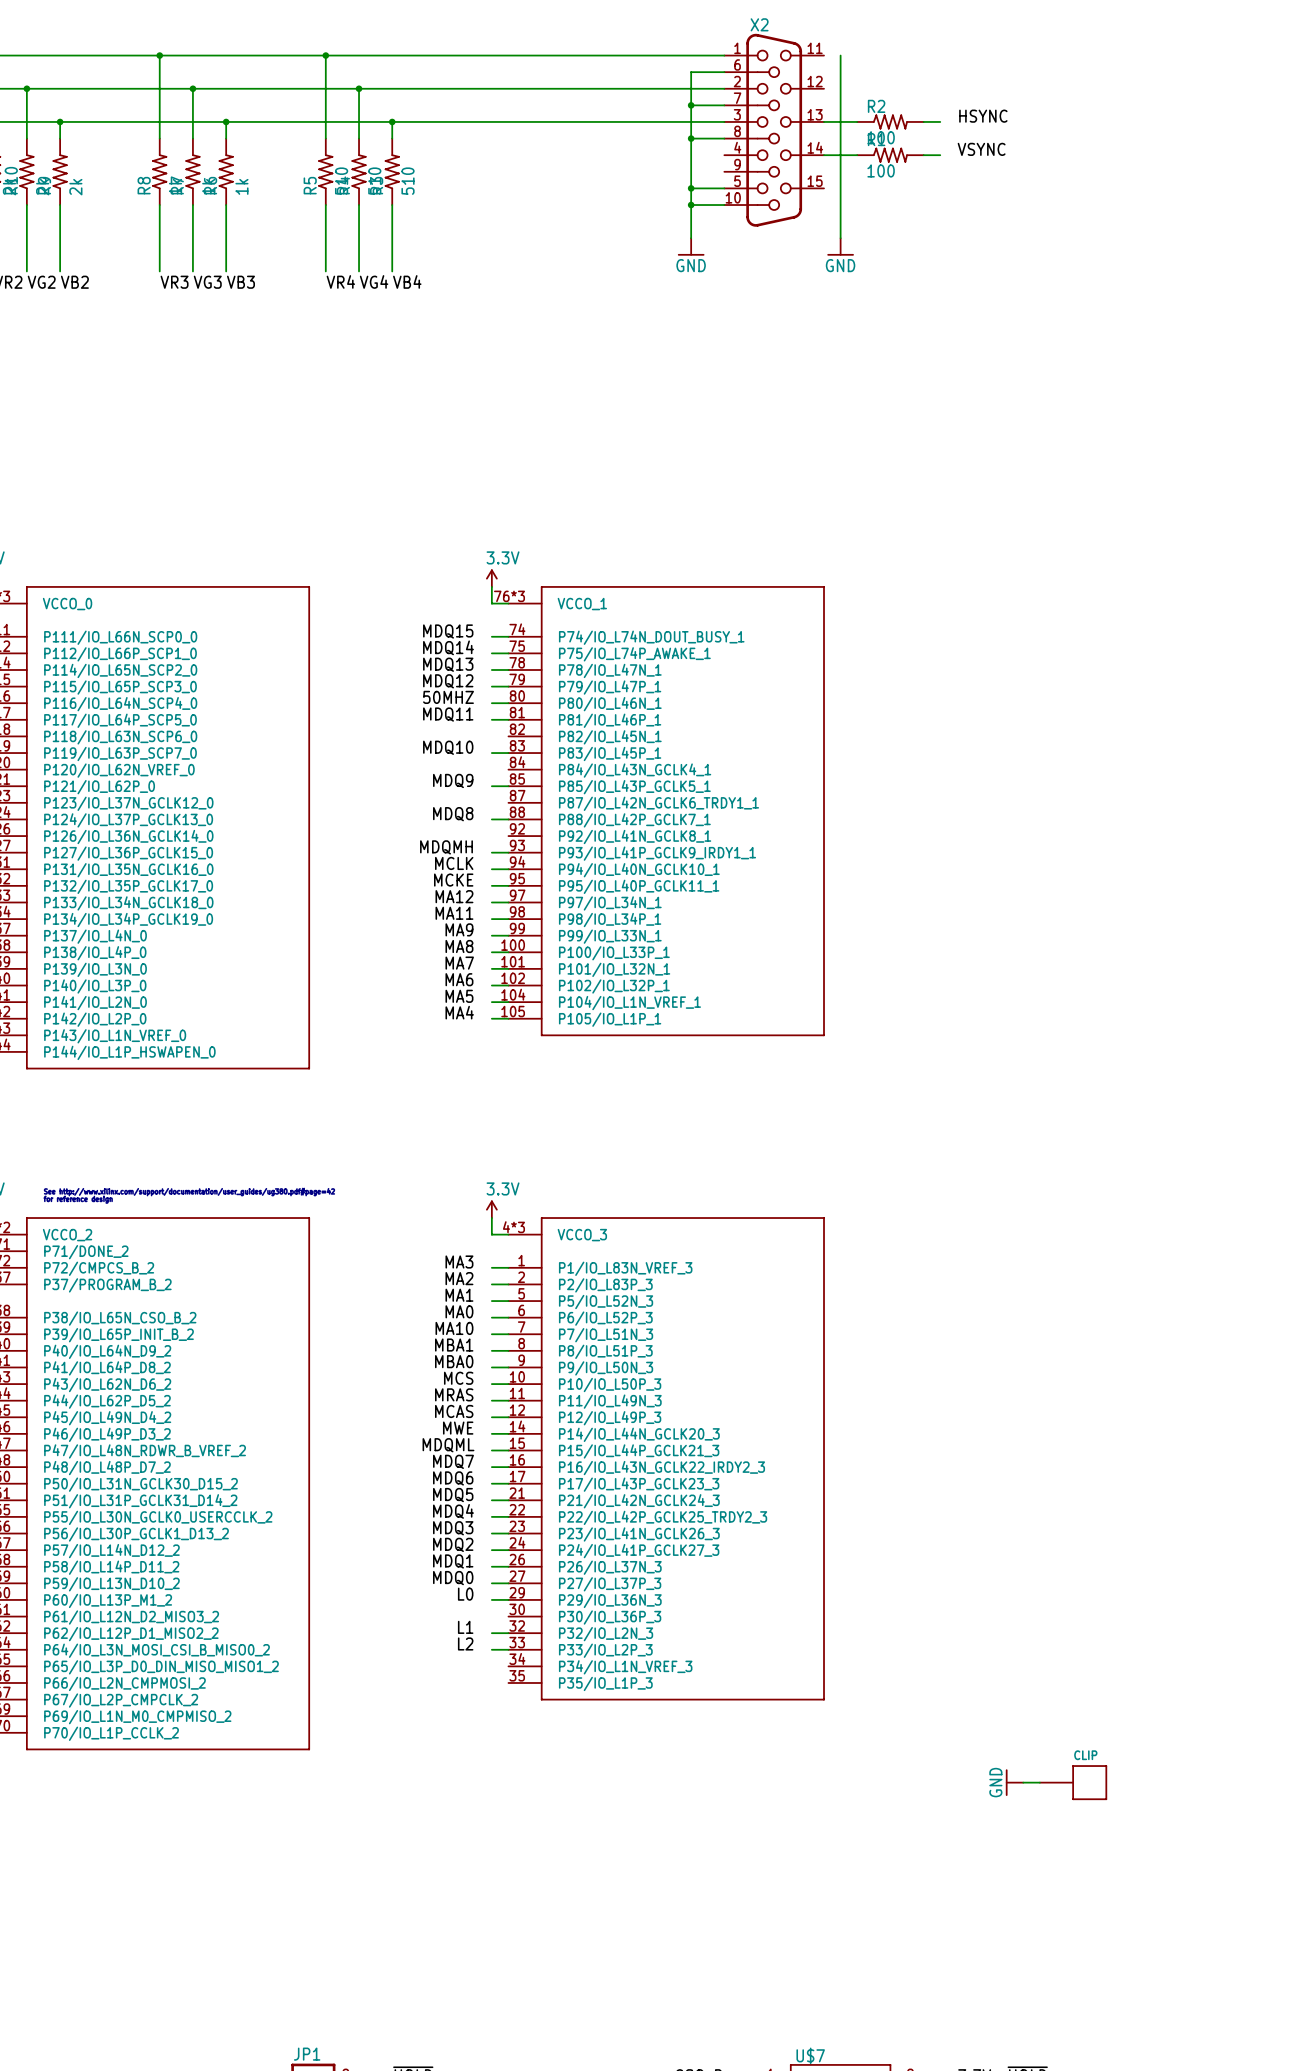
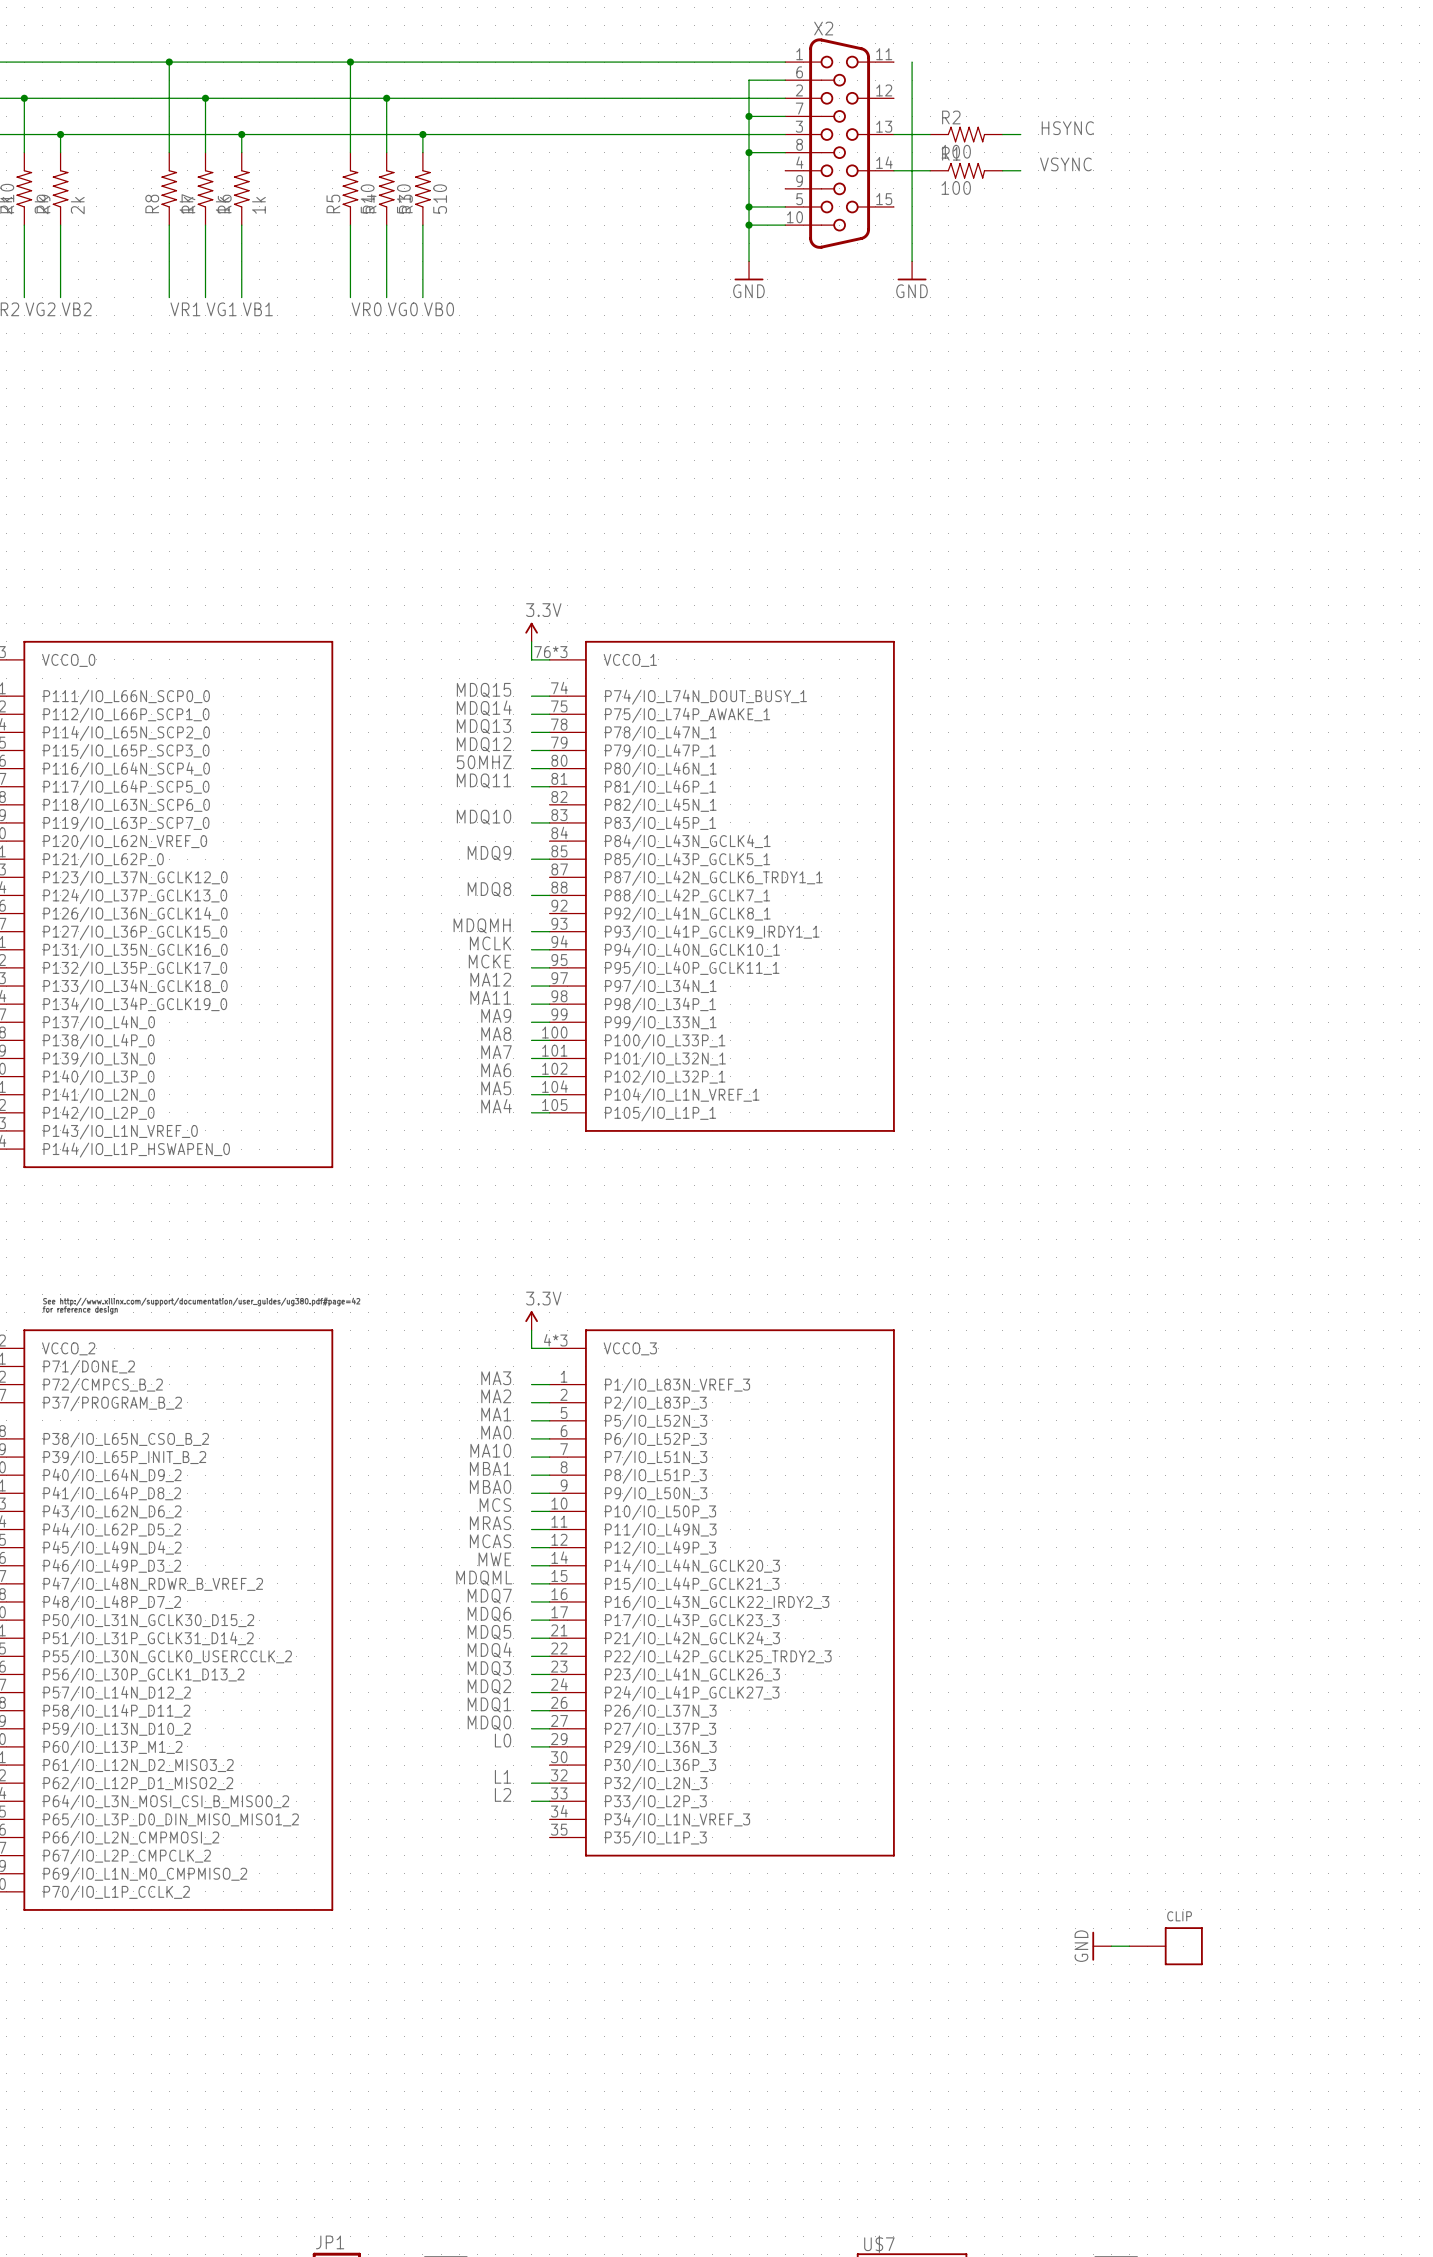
label: VR4 (340, 281) -> VR0 (366, 309)
label: VG4 (374, 281) -> VG0 (402, 309)
label: VB4 (407, 281) -> VB0 (439, 309)
label: VR3 (174, 282) -> VR1 (185, 309)
label: VG3 (207, 282) -> VG1 (221, 309)
label: VB3 (240, 282) -> VB1 (257, 309)

